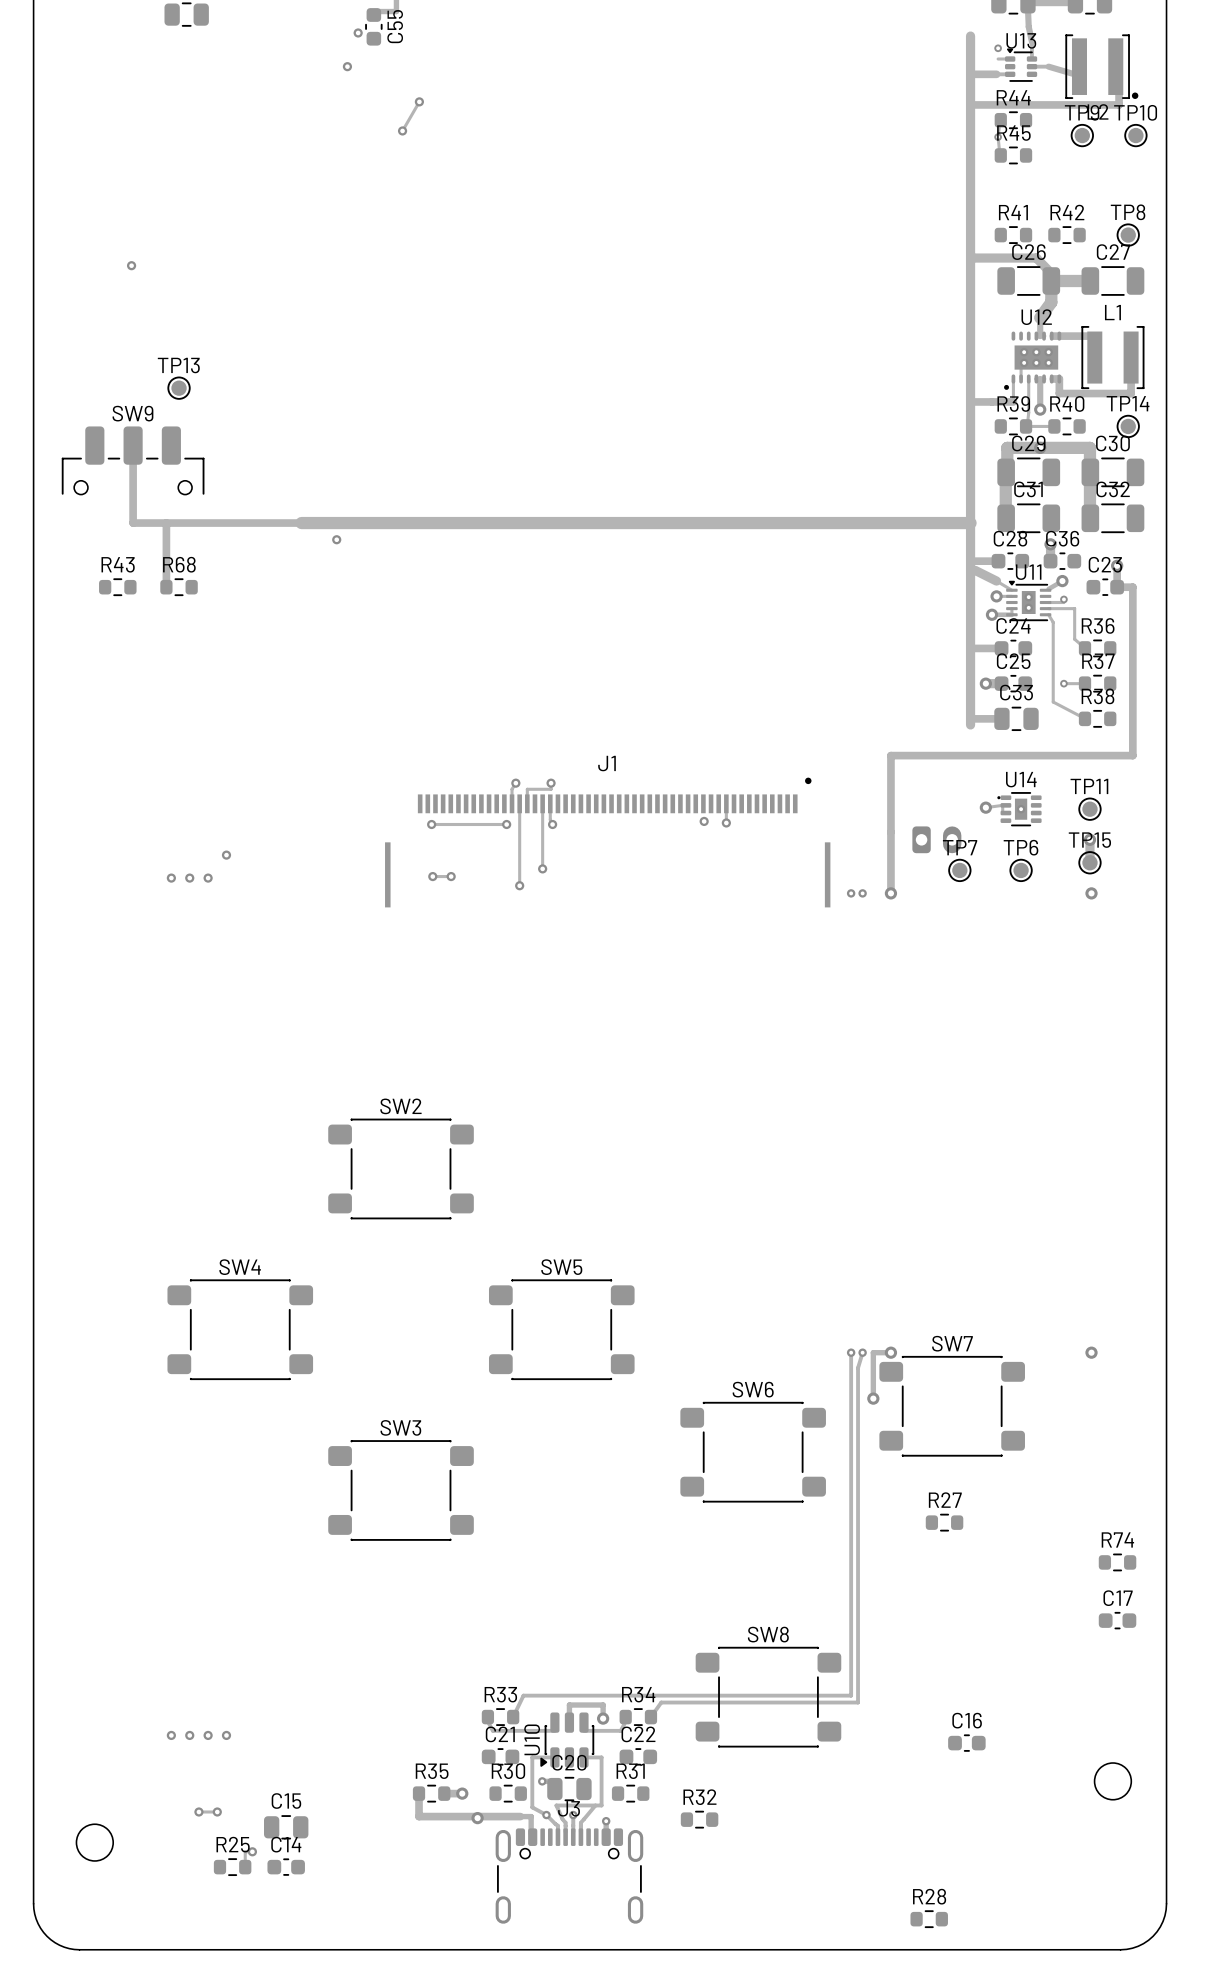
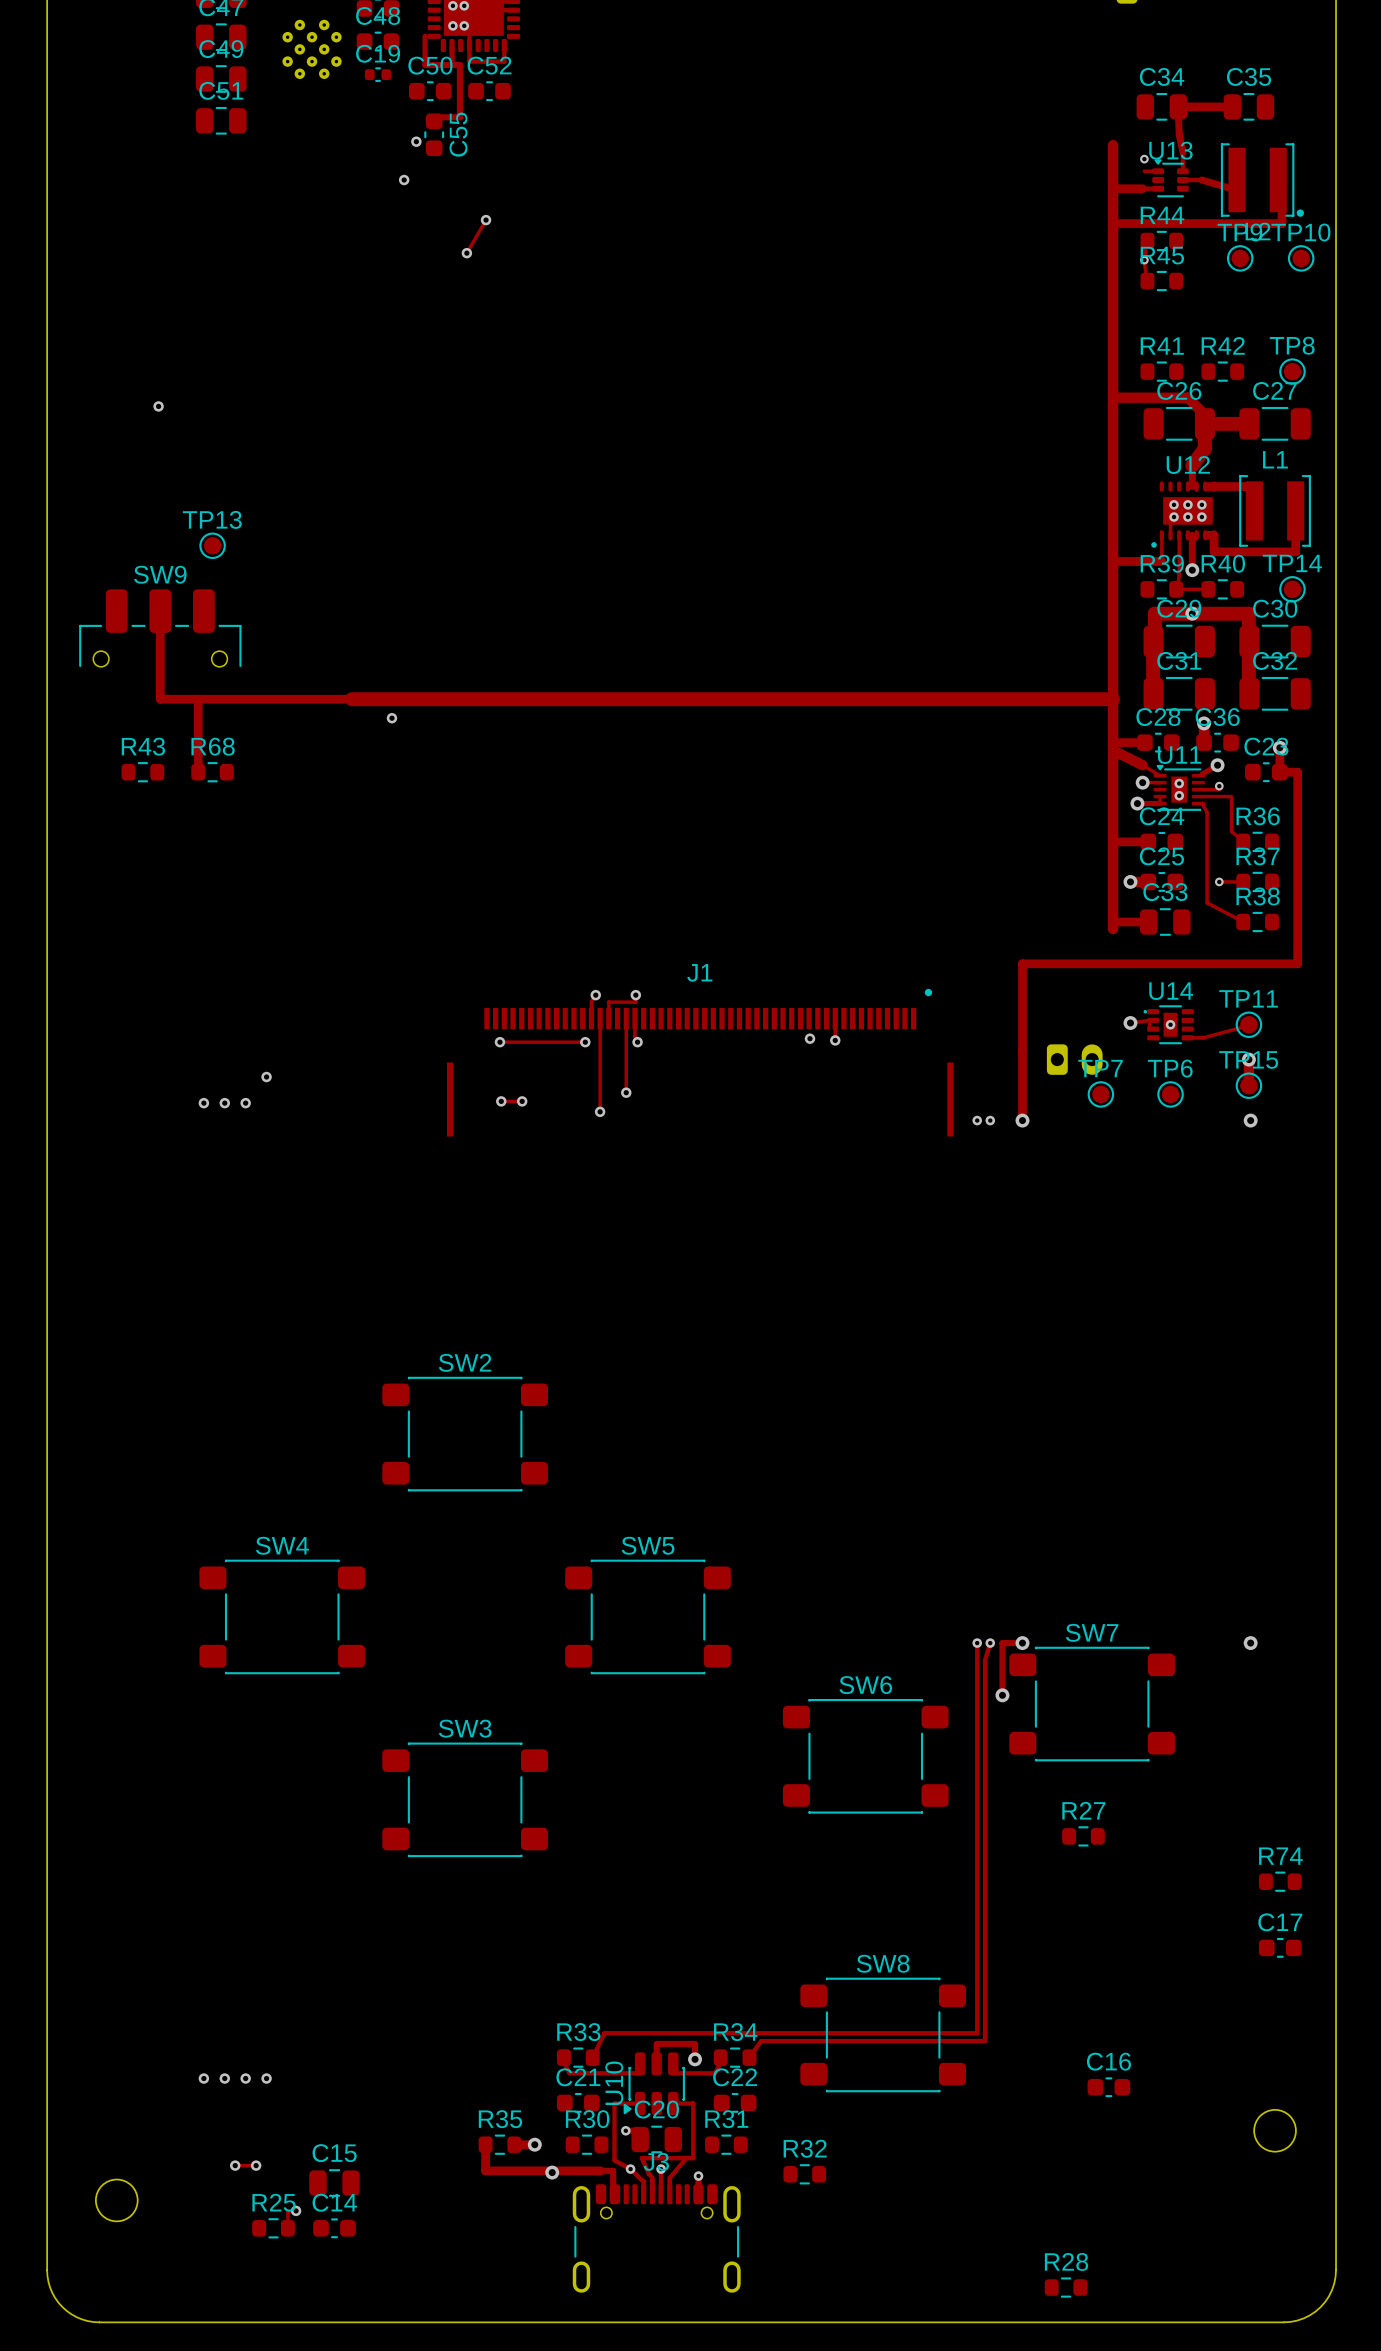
track: none -> (1245, 1026) (1203, 1037) (1191, 1037)

